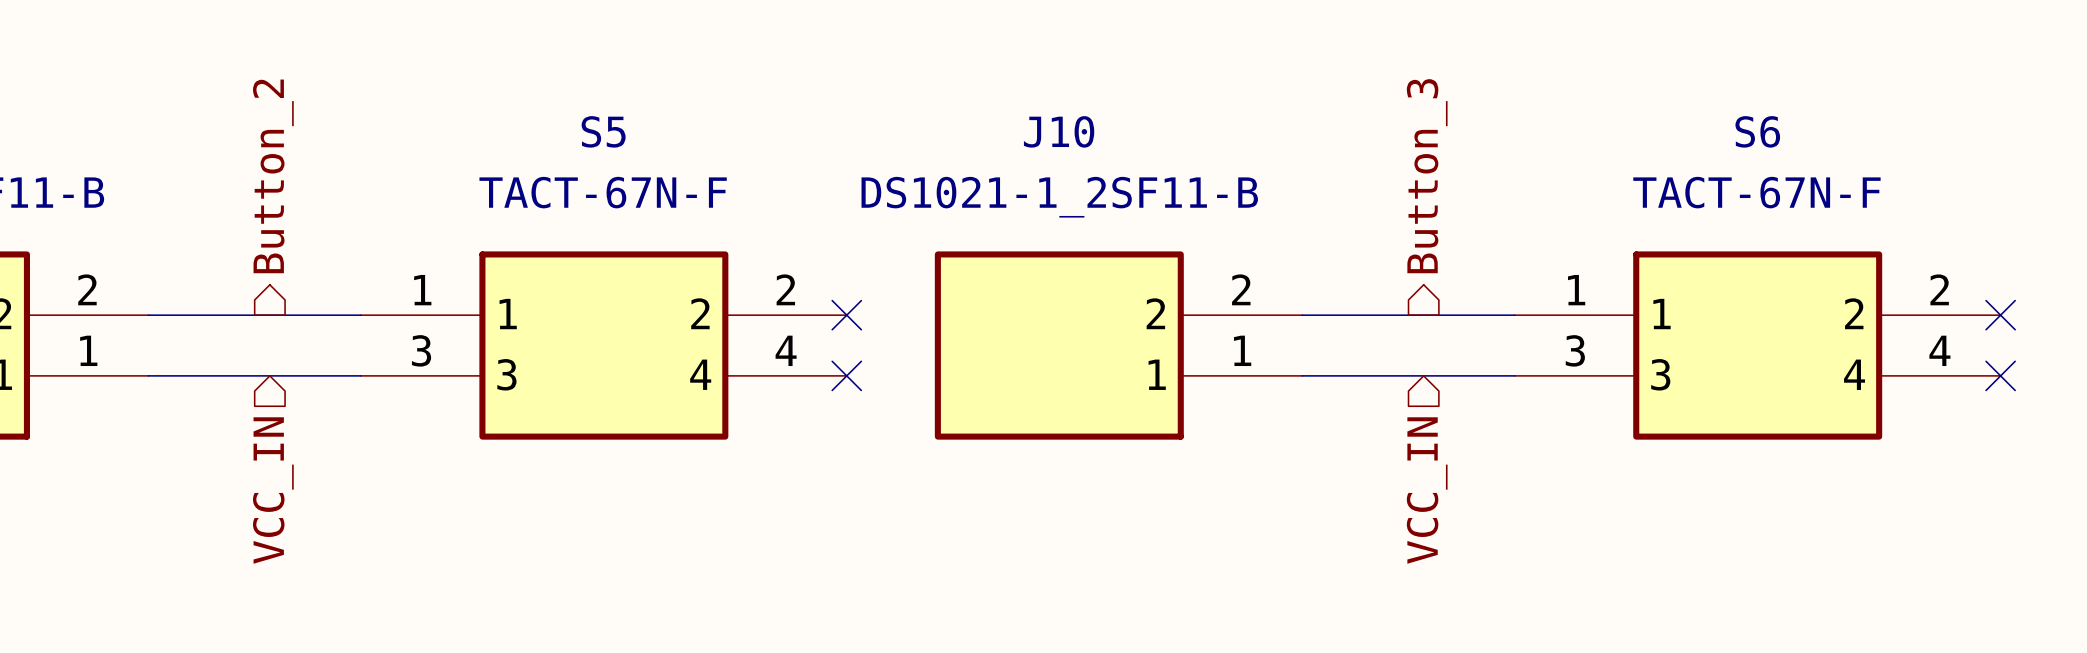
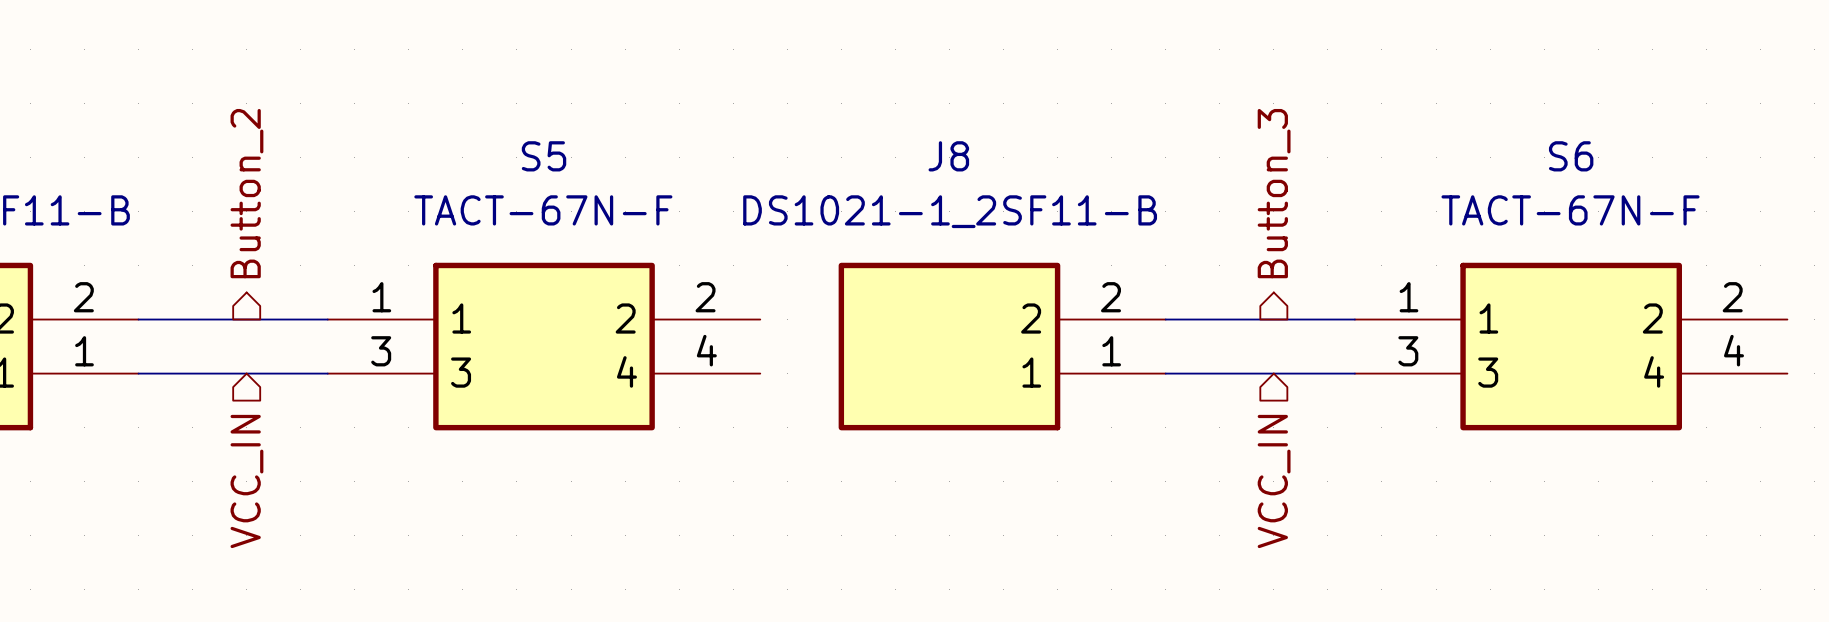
J10 name: J10 (1059, 131) -> J8 (948, 156)
no-connect mark: (846, 315) -> none
no-connect mark: (2000, 315) -> none
no-connect mark: (846, 375) -> none
no-connect mark: (2000, 375) -> none

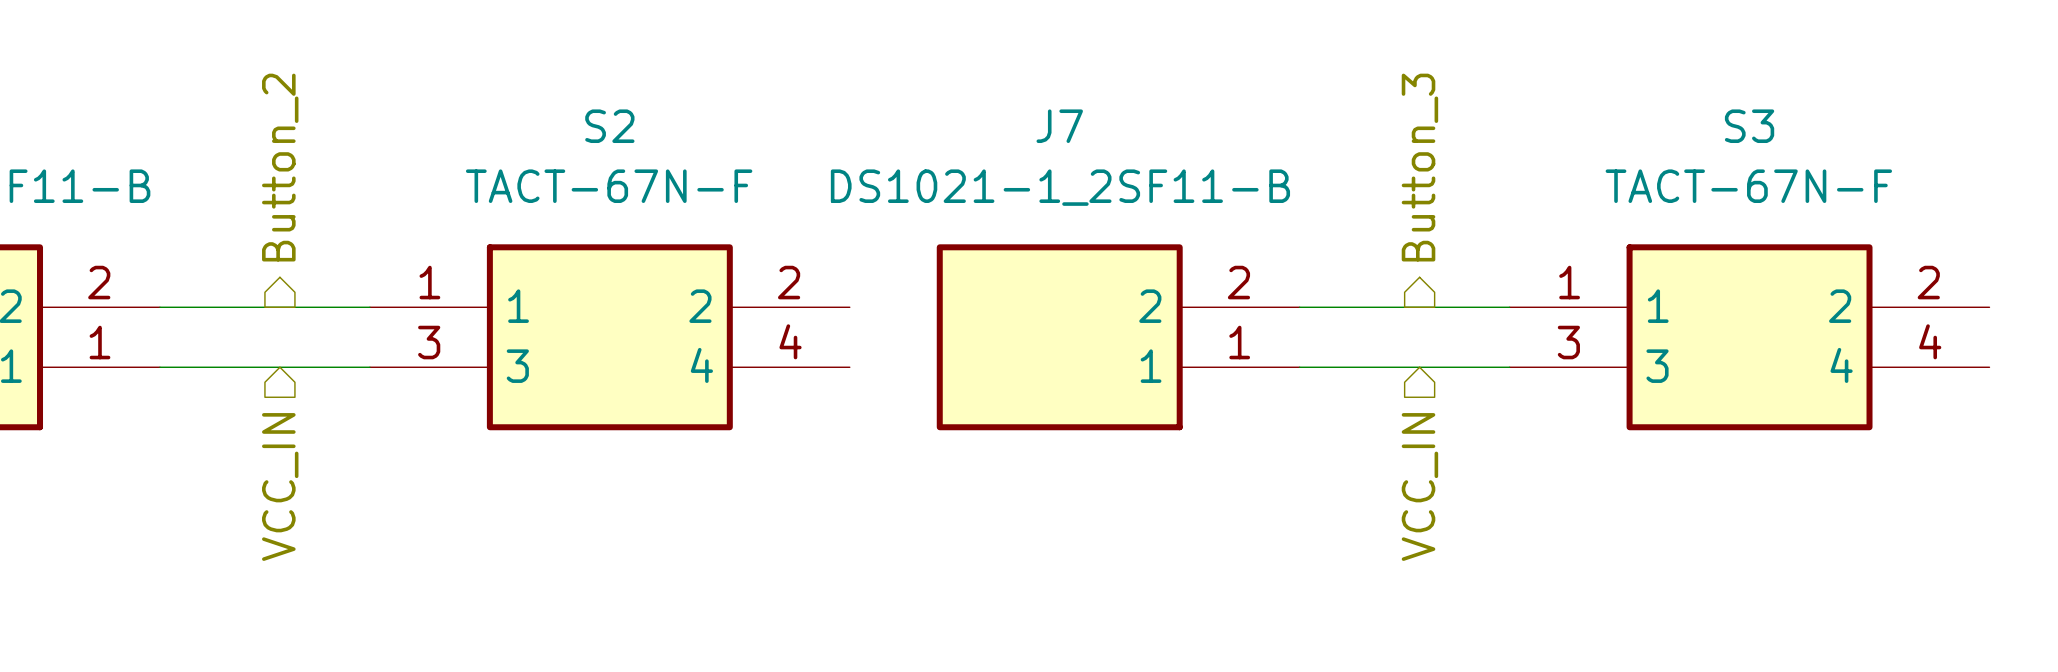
S5 name: S5 (544, 156) -> S2 (609, 126)
J8 name: J8 (948, 156) -> J7 (1059, 126)
S6 name: S6 (1571, 156) -> S3 (1749, 126)

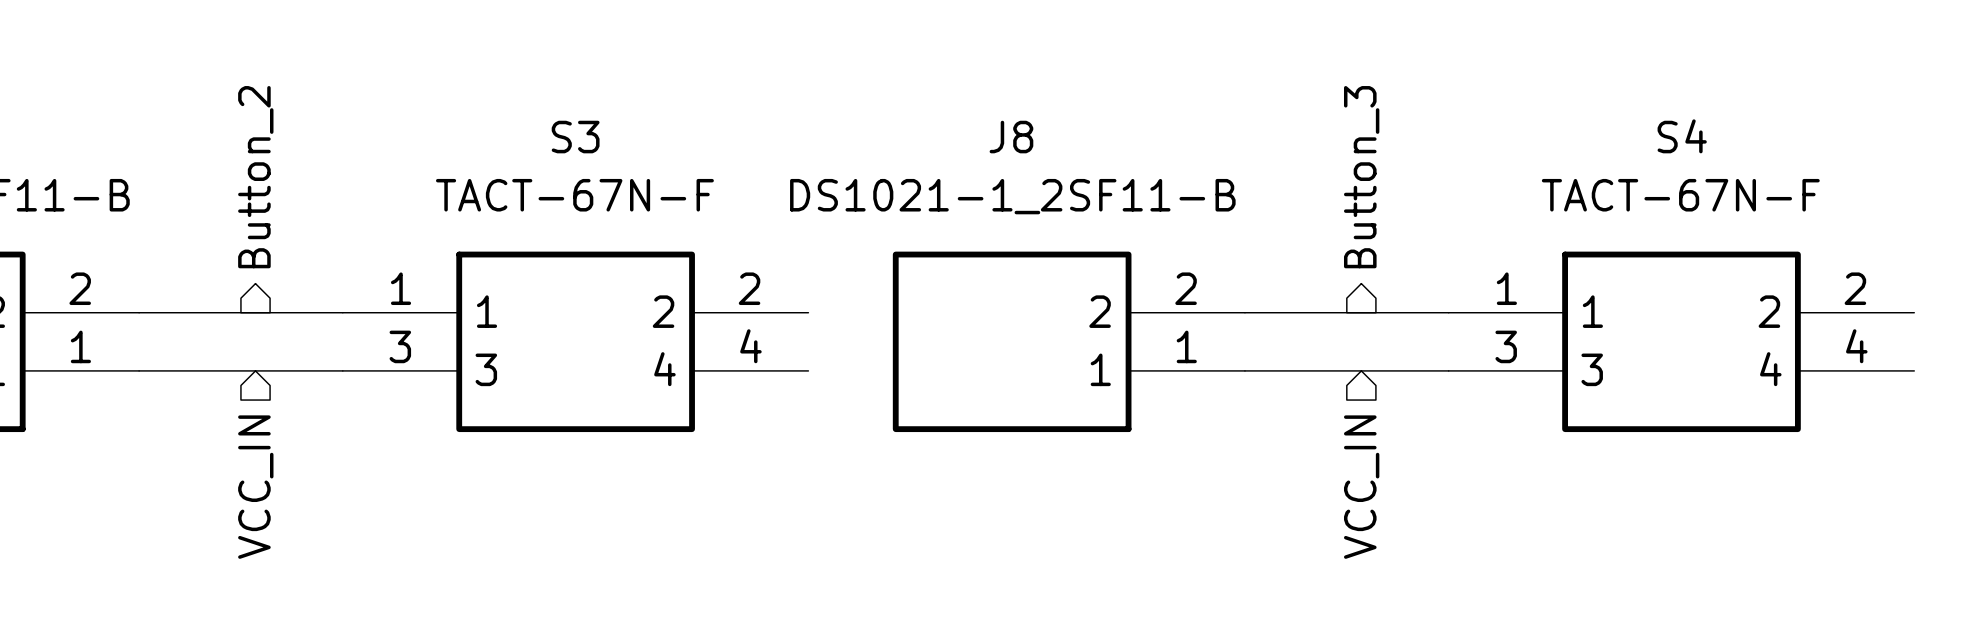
S2 name: S2 (609, 126) -> S3 (575, 137)
J7 name: J7 (1059, 126) -> J8 (1011, 137)
S3 name: S3 (1749, 126) -> S4 (1682, 136)

